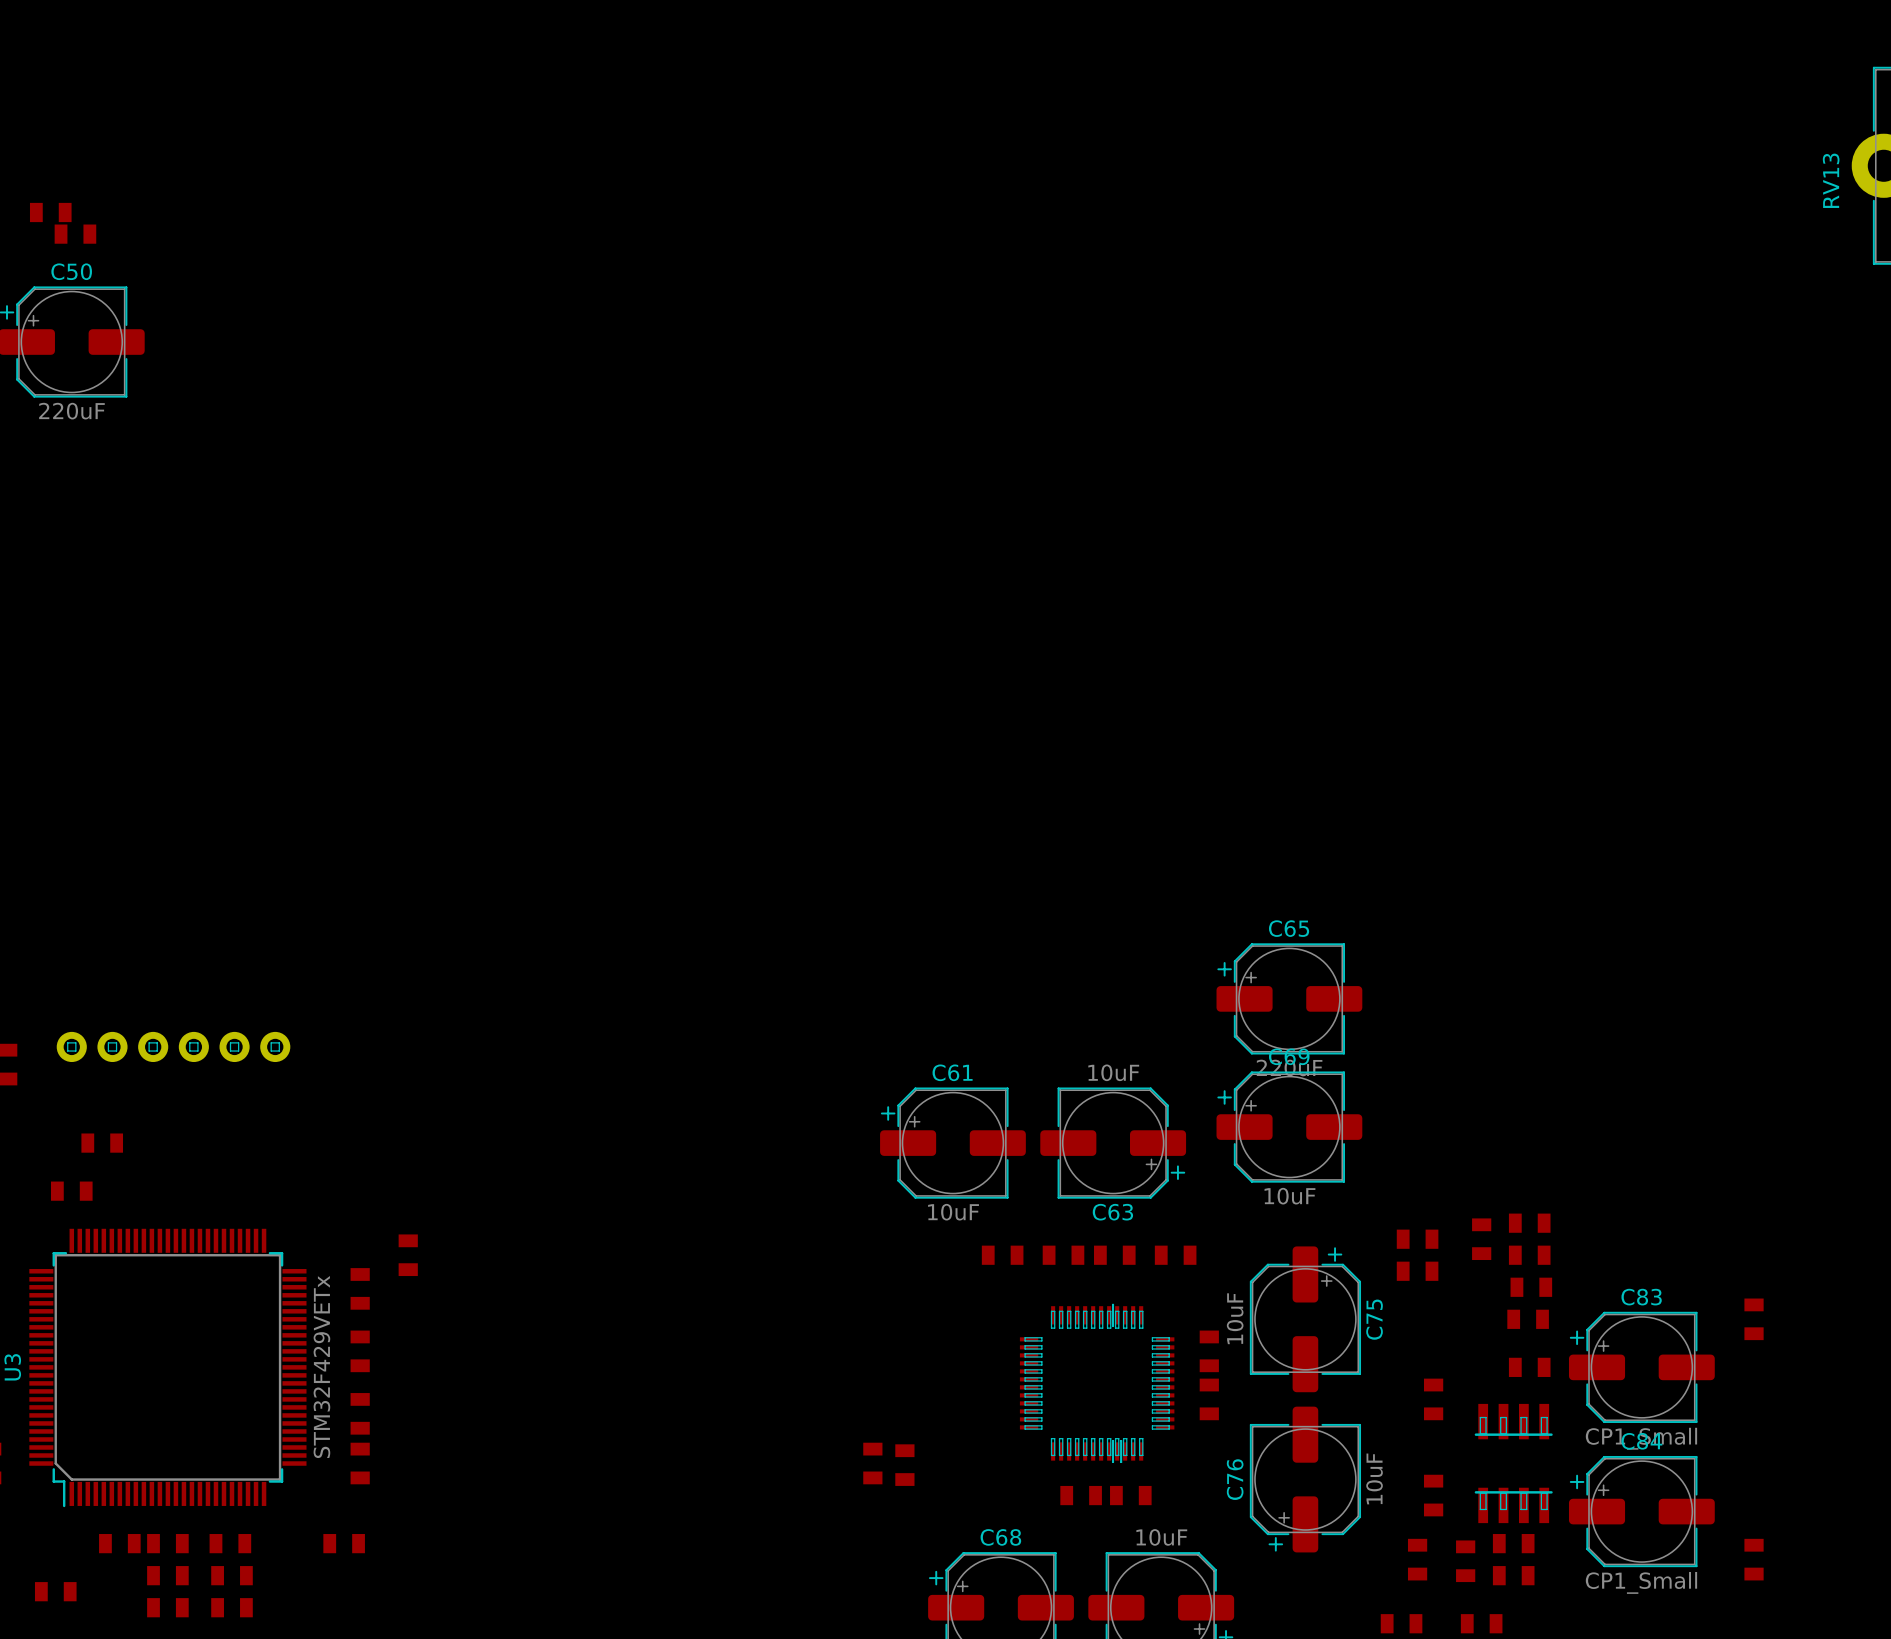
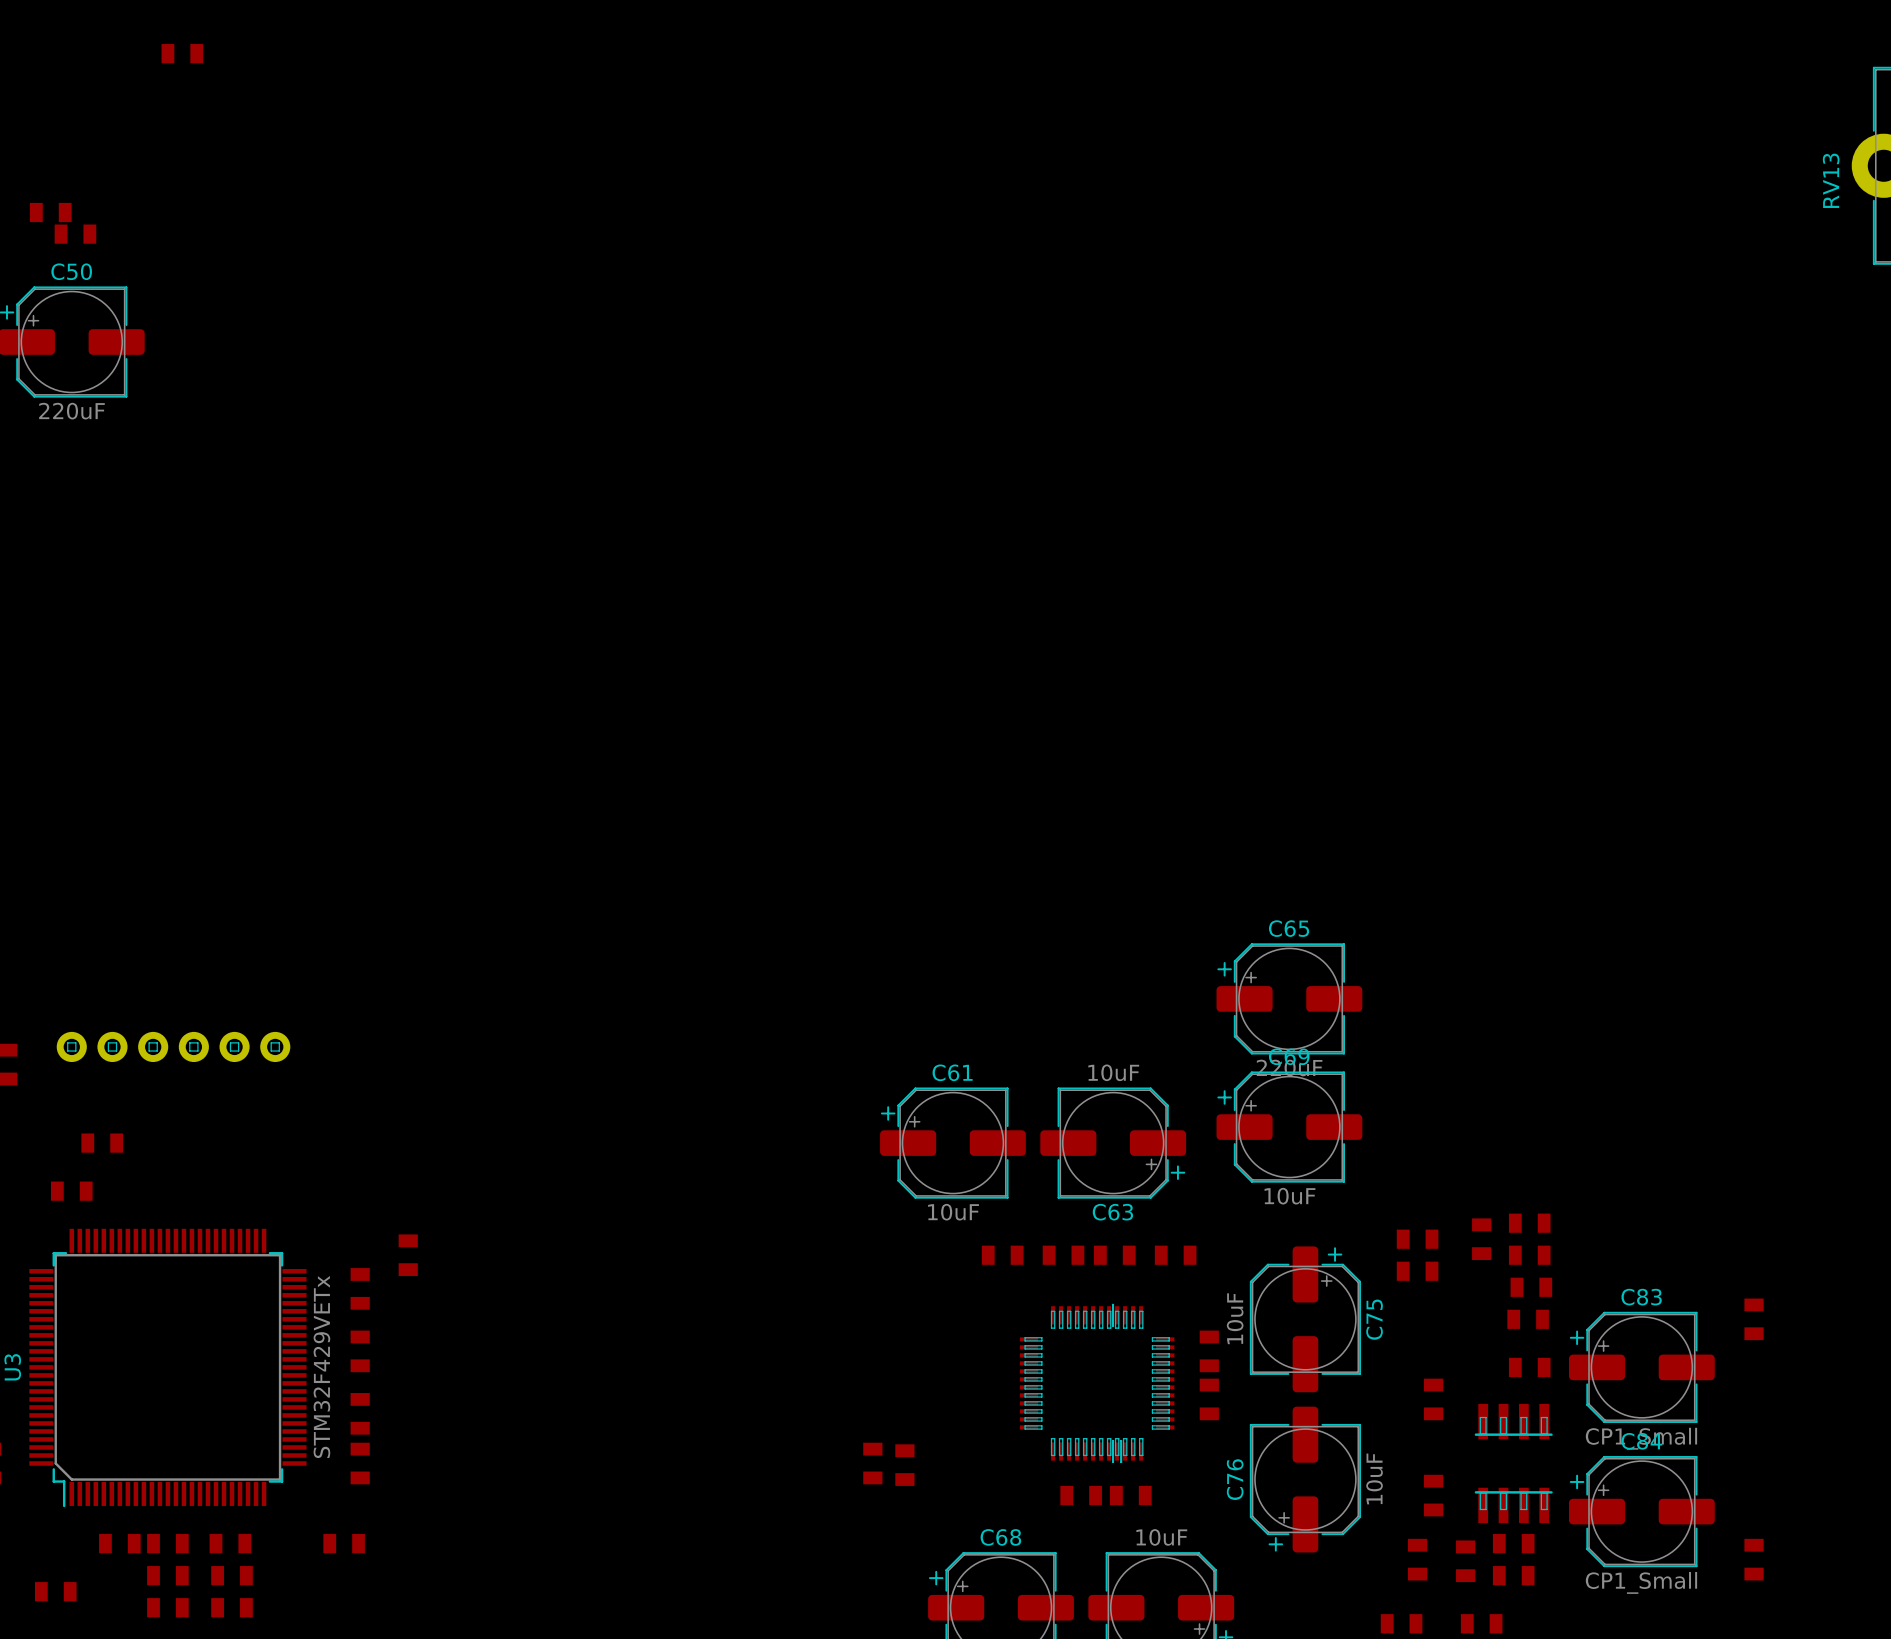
part: none -> (182, 53)

